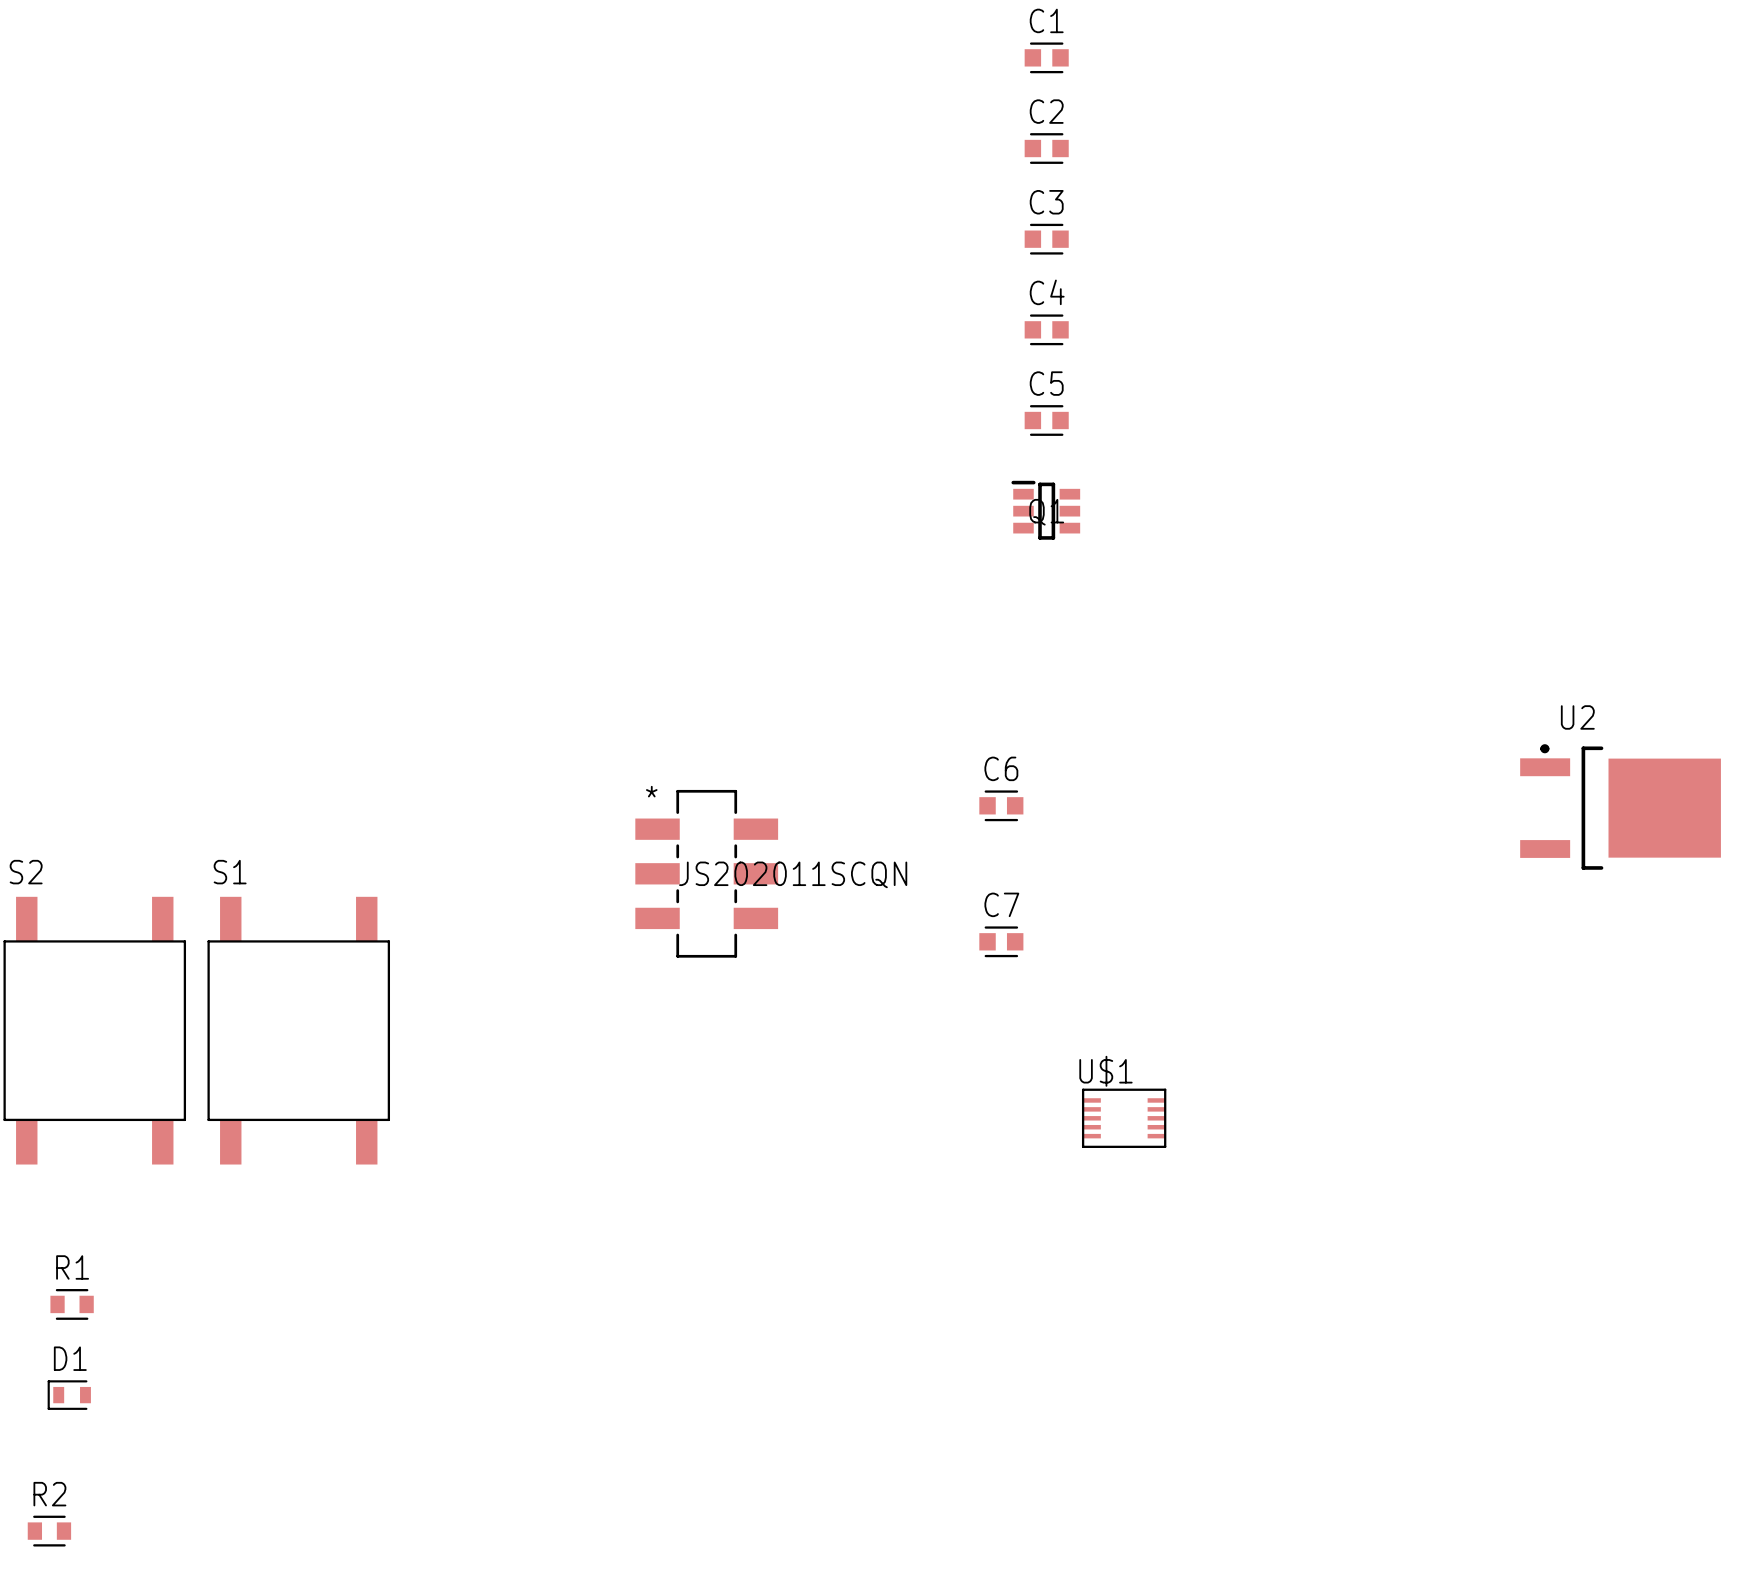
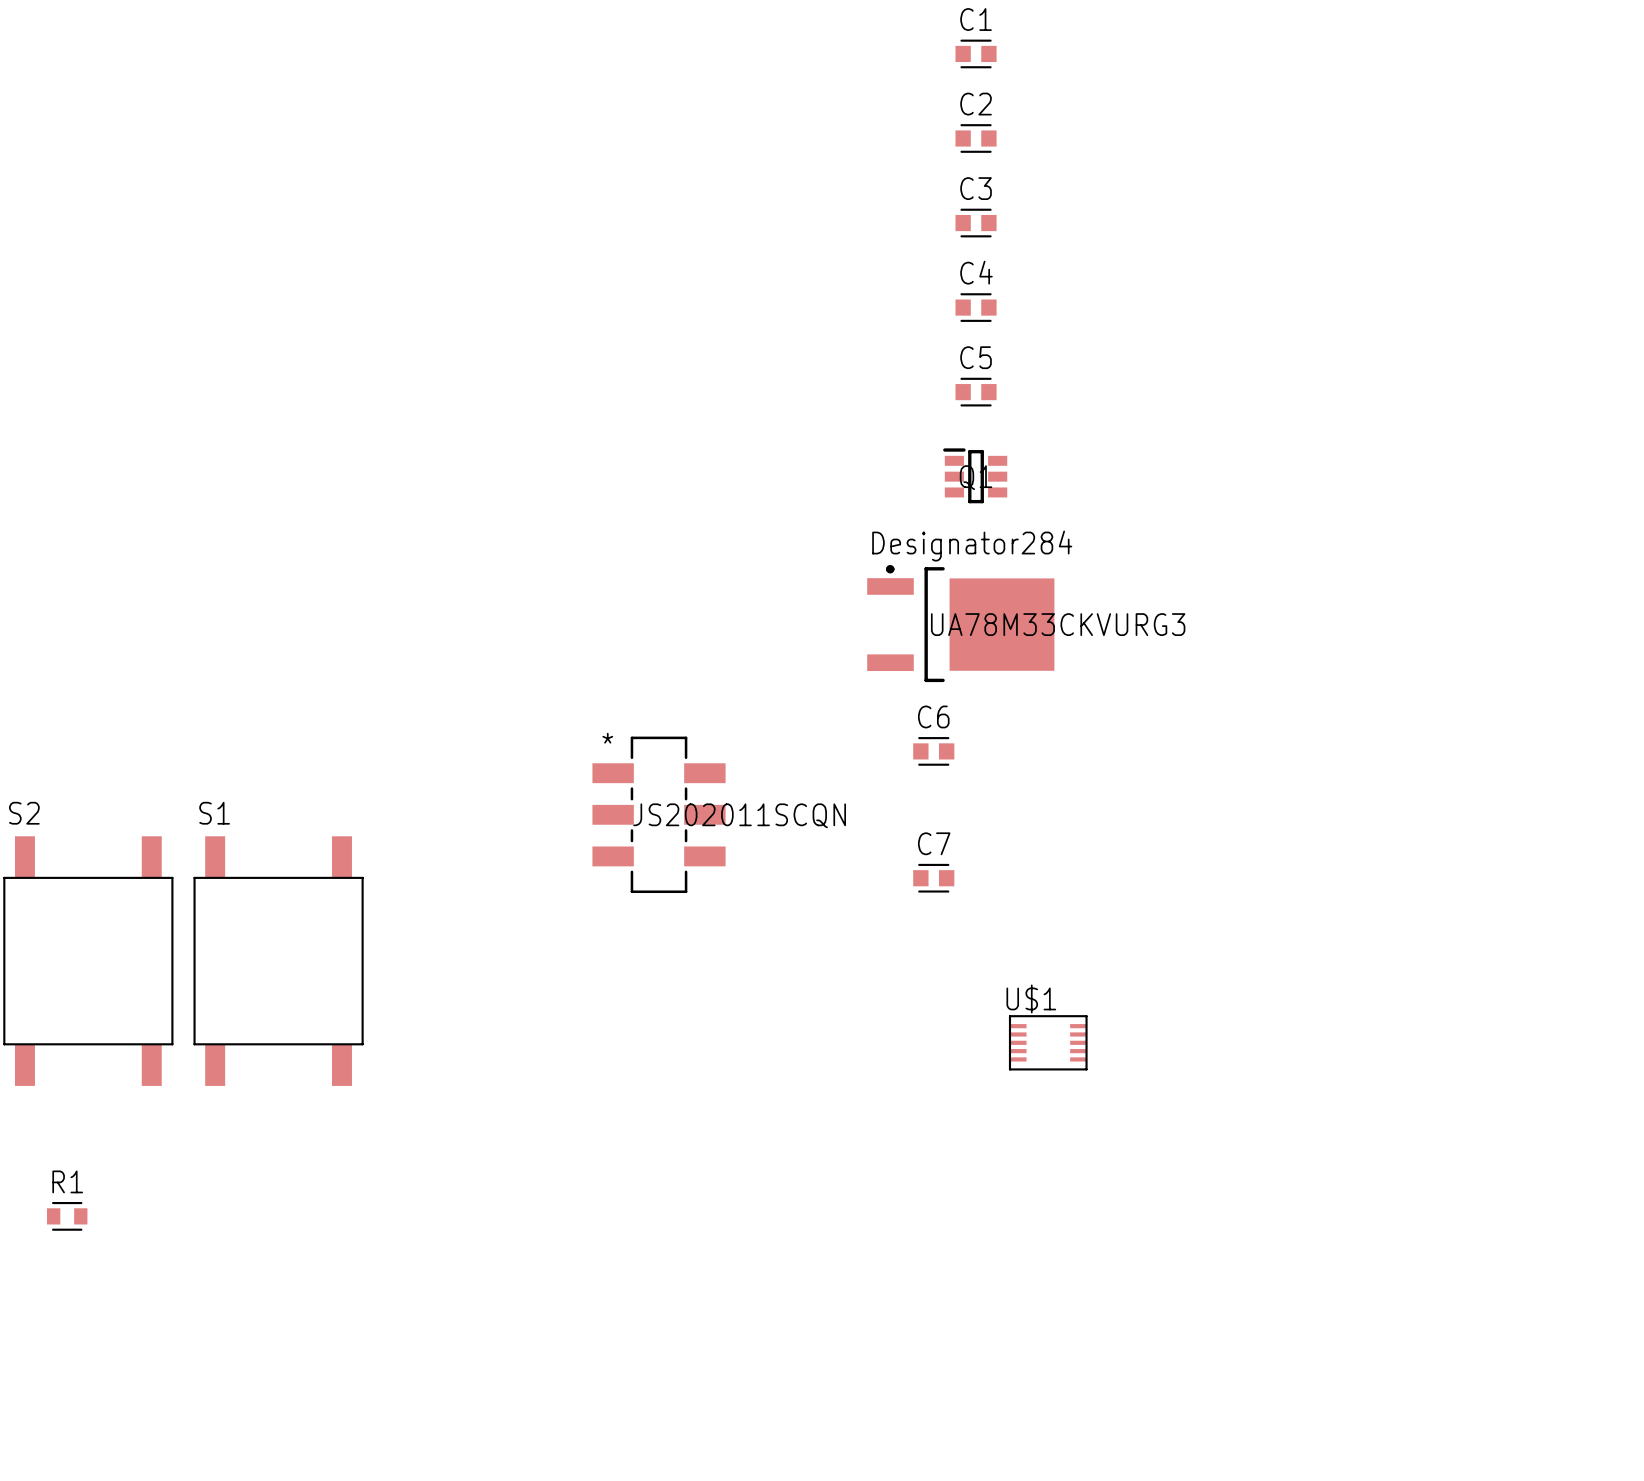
part: none -> UA78M33CKVURG3 (960, 623)
U2: (1620, 806) -> none
D1: (69, 1395) -> none
R2: (49, 1531) -> none

